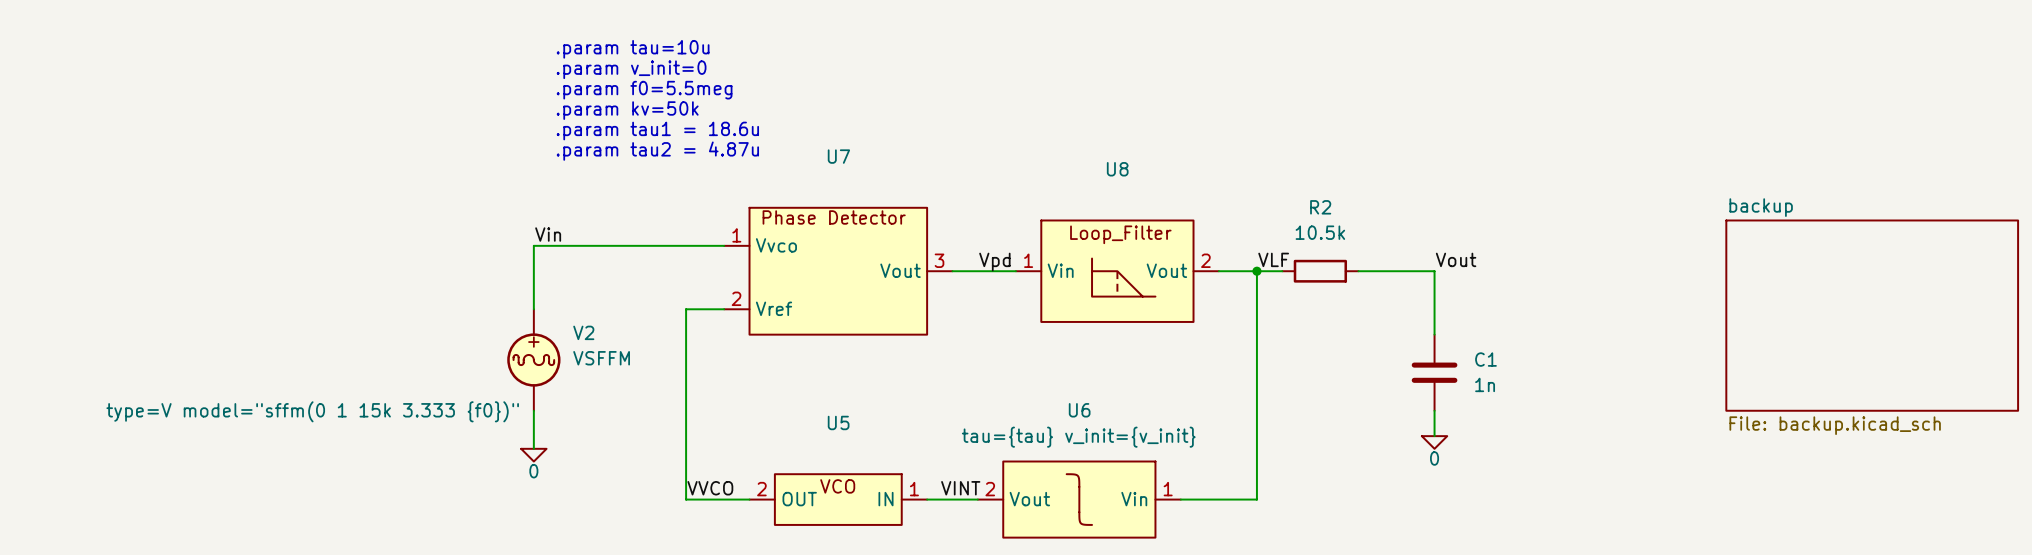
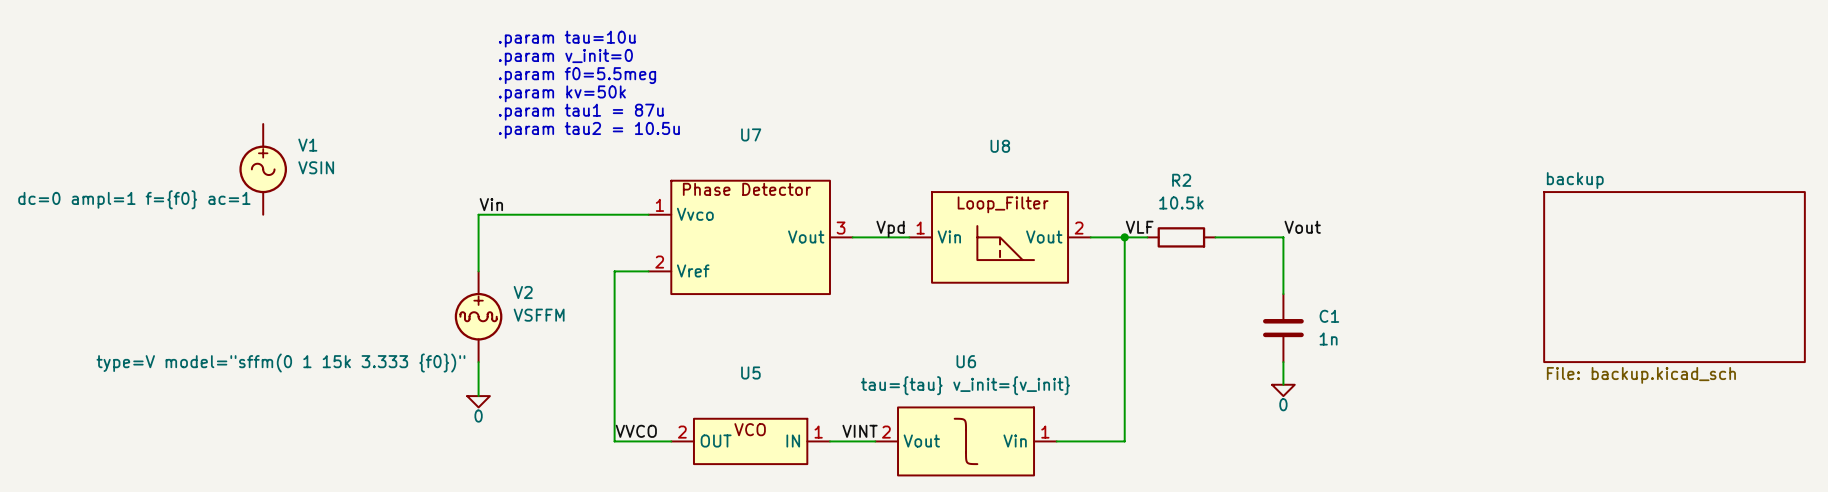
text: .param tau1 = 18.6u (657, 131) -> .param tau1 = 87u (581, 112)
text: .param tau2 = 4.87u (657, 151) -> .param tau2 = 10.5u (589, 130)
V1: none -> VSIN (263, 169)

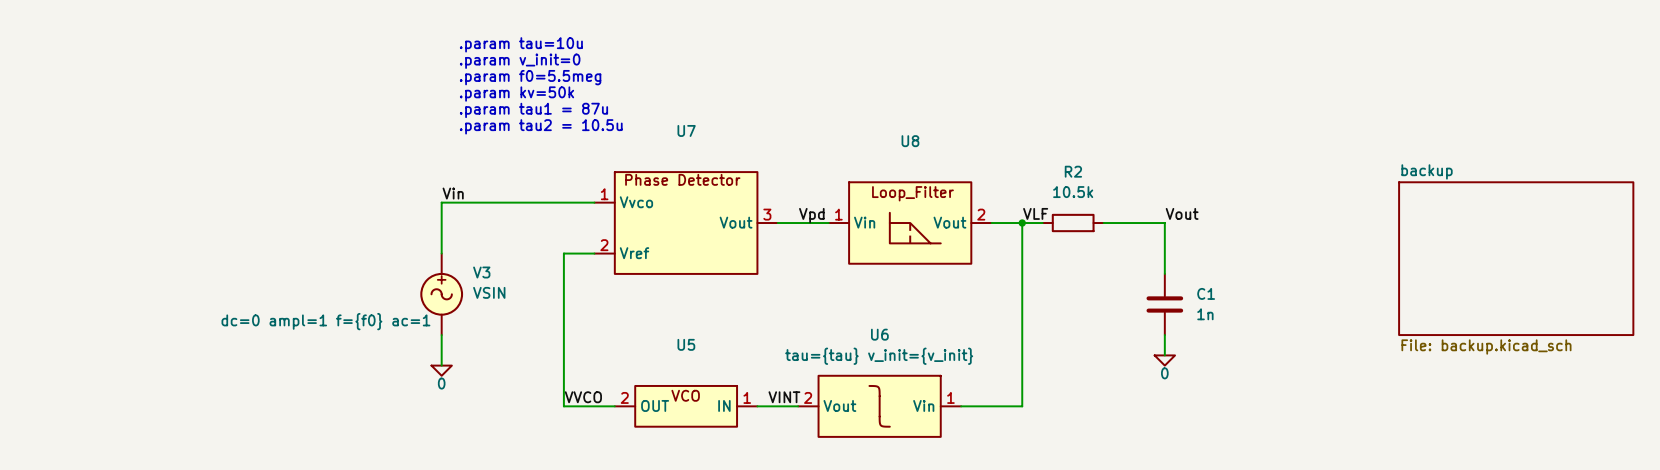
V1: VSIN (263, 169) -> none
V2: VSFFM (478, 316) -> none
V3: none -> VSIN (441, 294)

